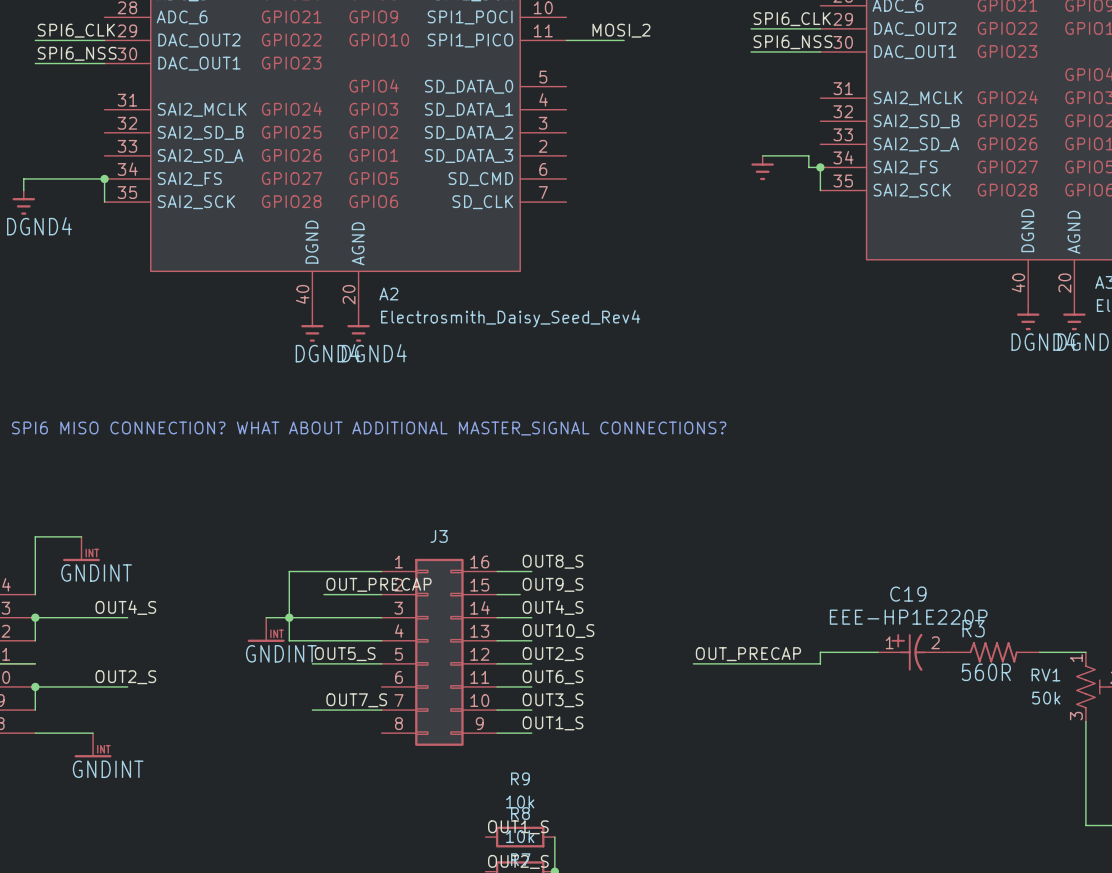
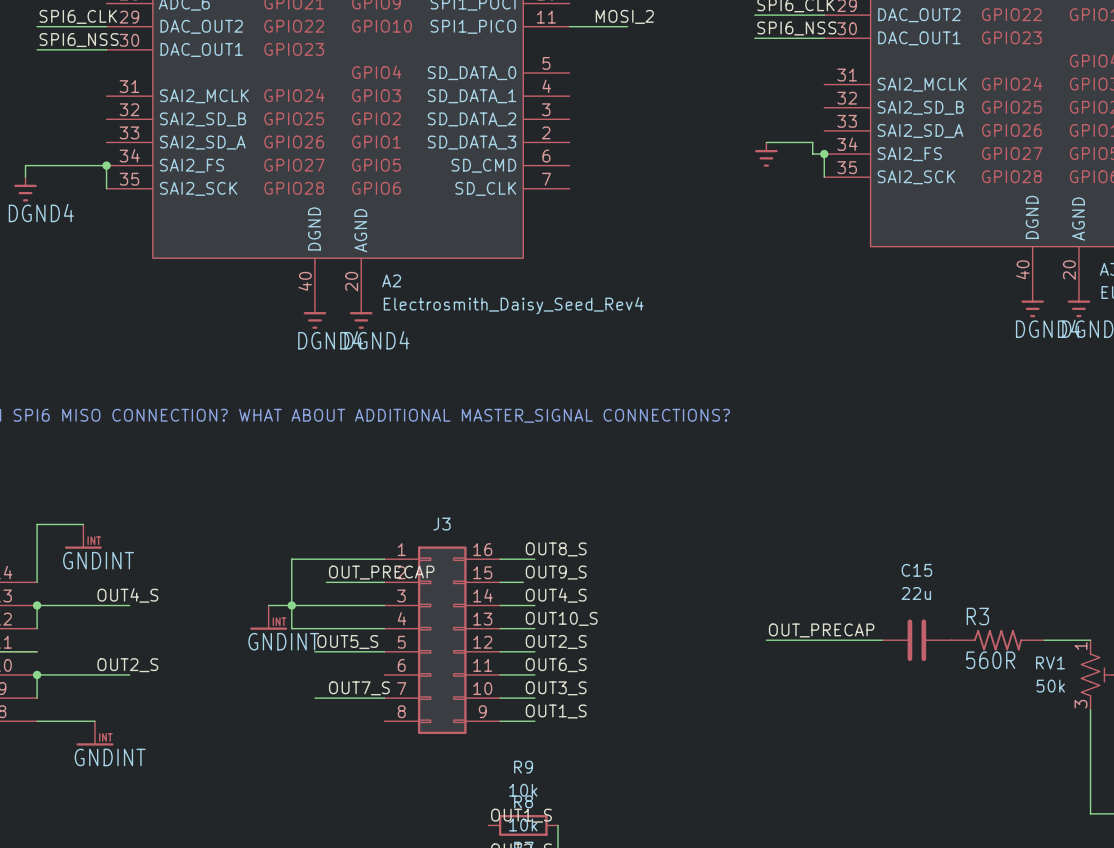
wire: (820, 652) (820, 663) (693, 663) -> (824, 640) (766, 640)
C19: EEE-HP1E220P (912, 652) -> none
C15: none -> 22u (916, 640)
label position: OUT_PRECAP (748, 654) -> OUT_PRECAP (821, 630)

